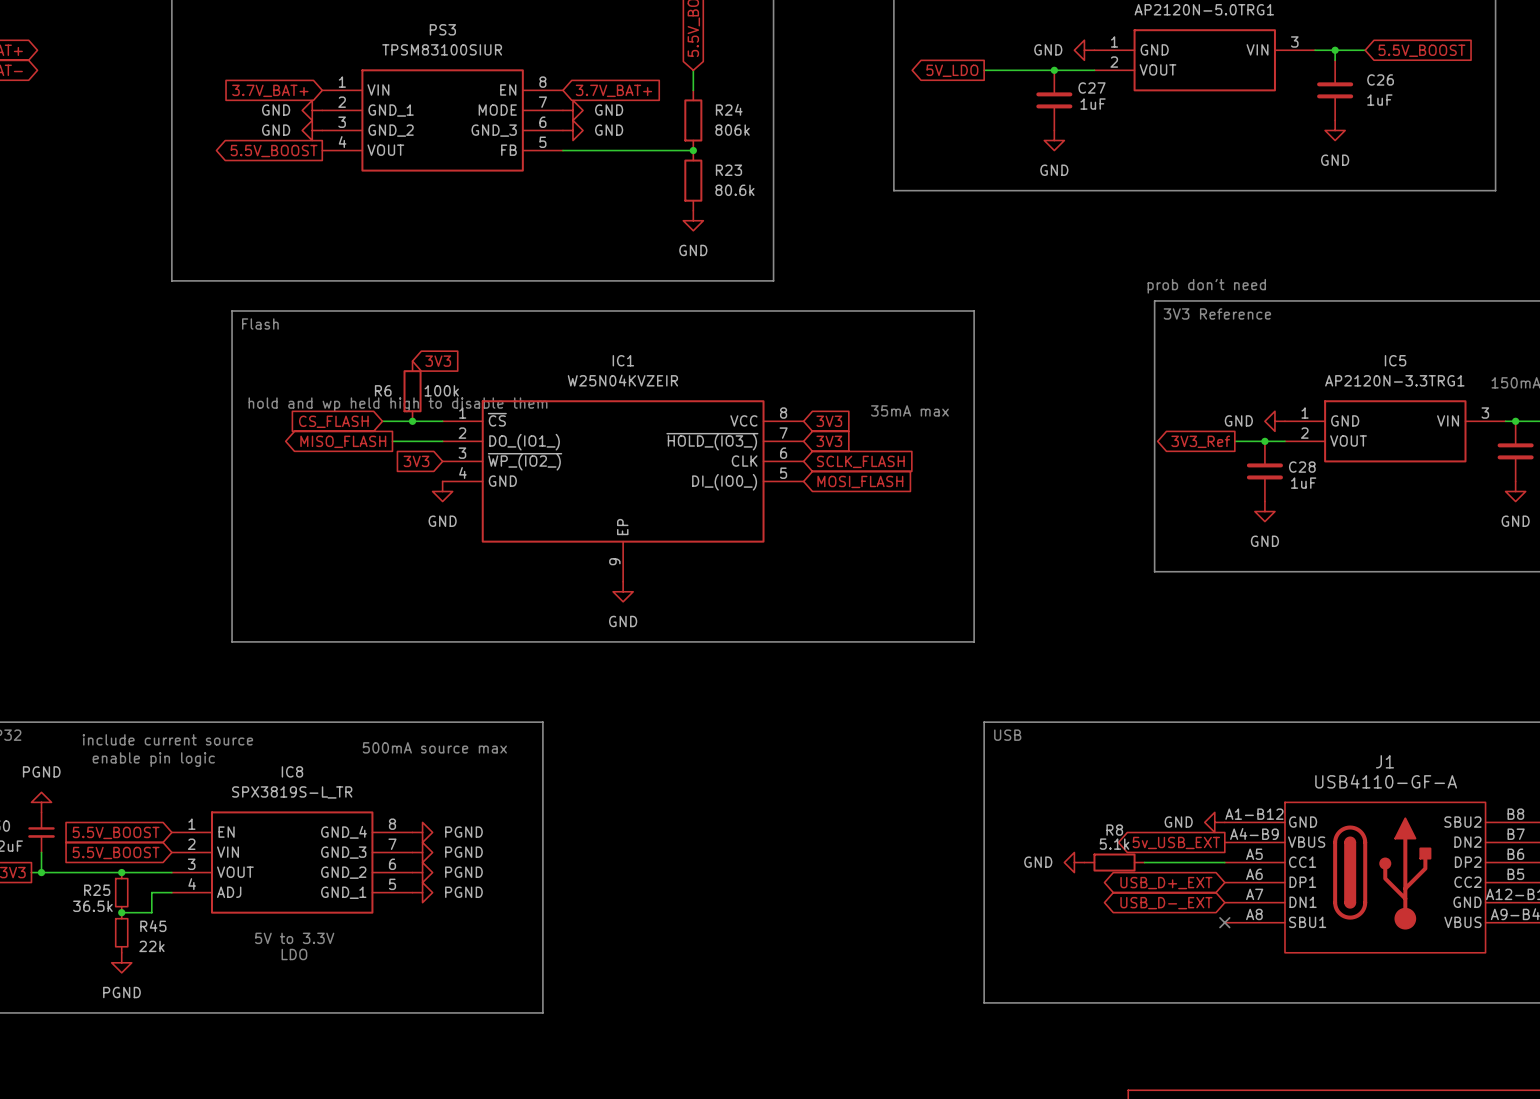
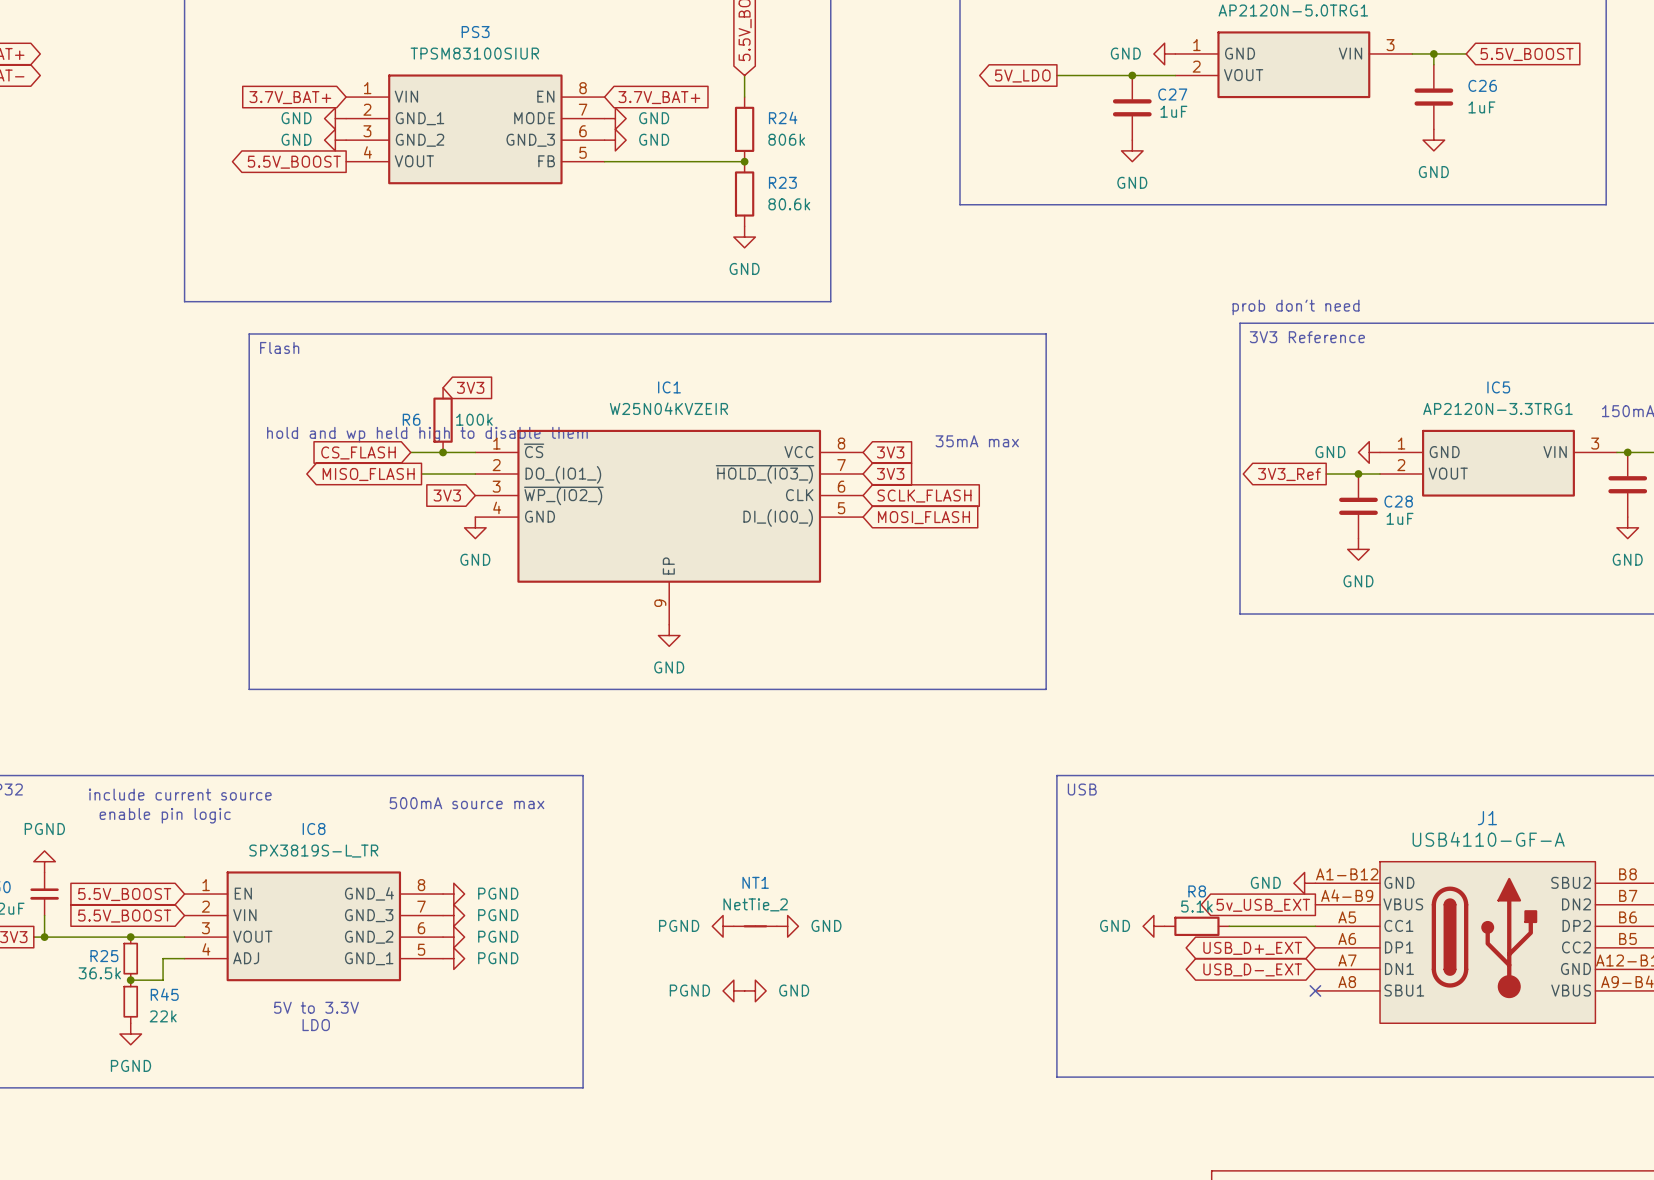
power symbol: none -> PGND (723, 926)
NT1: none -> NetTie_2 (755, 926)
power symbol: none -> GND (787, 926)
power symbol: none -> PGND (733, 990)
power symbol: none -> GND (755, 990)

